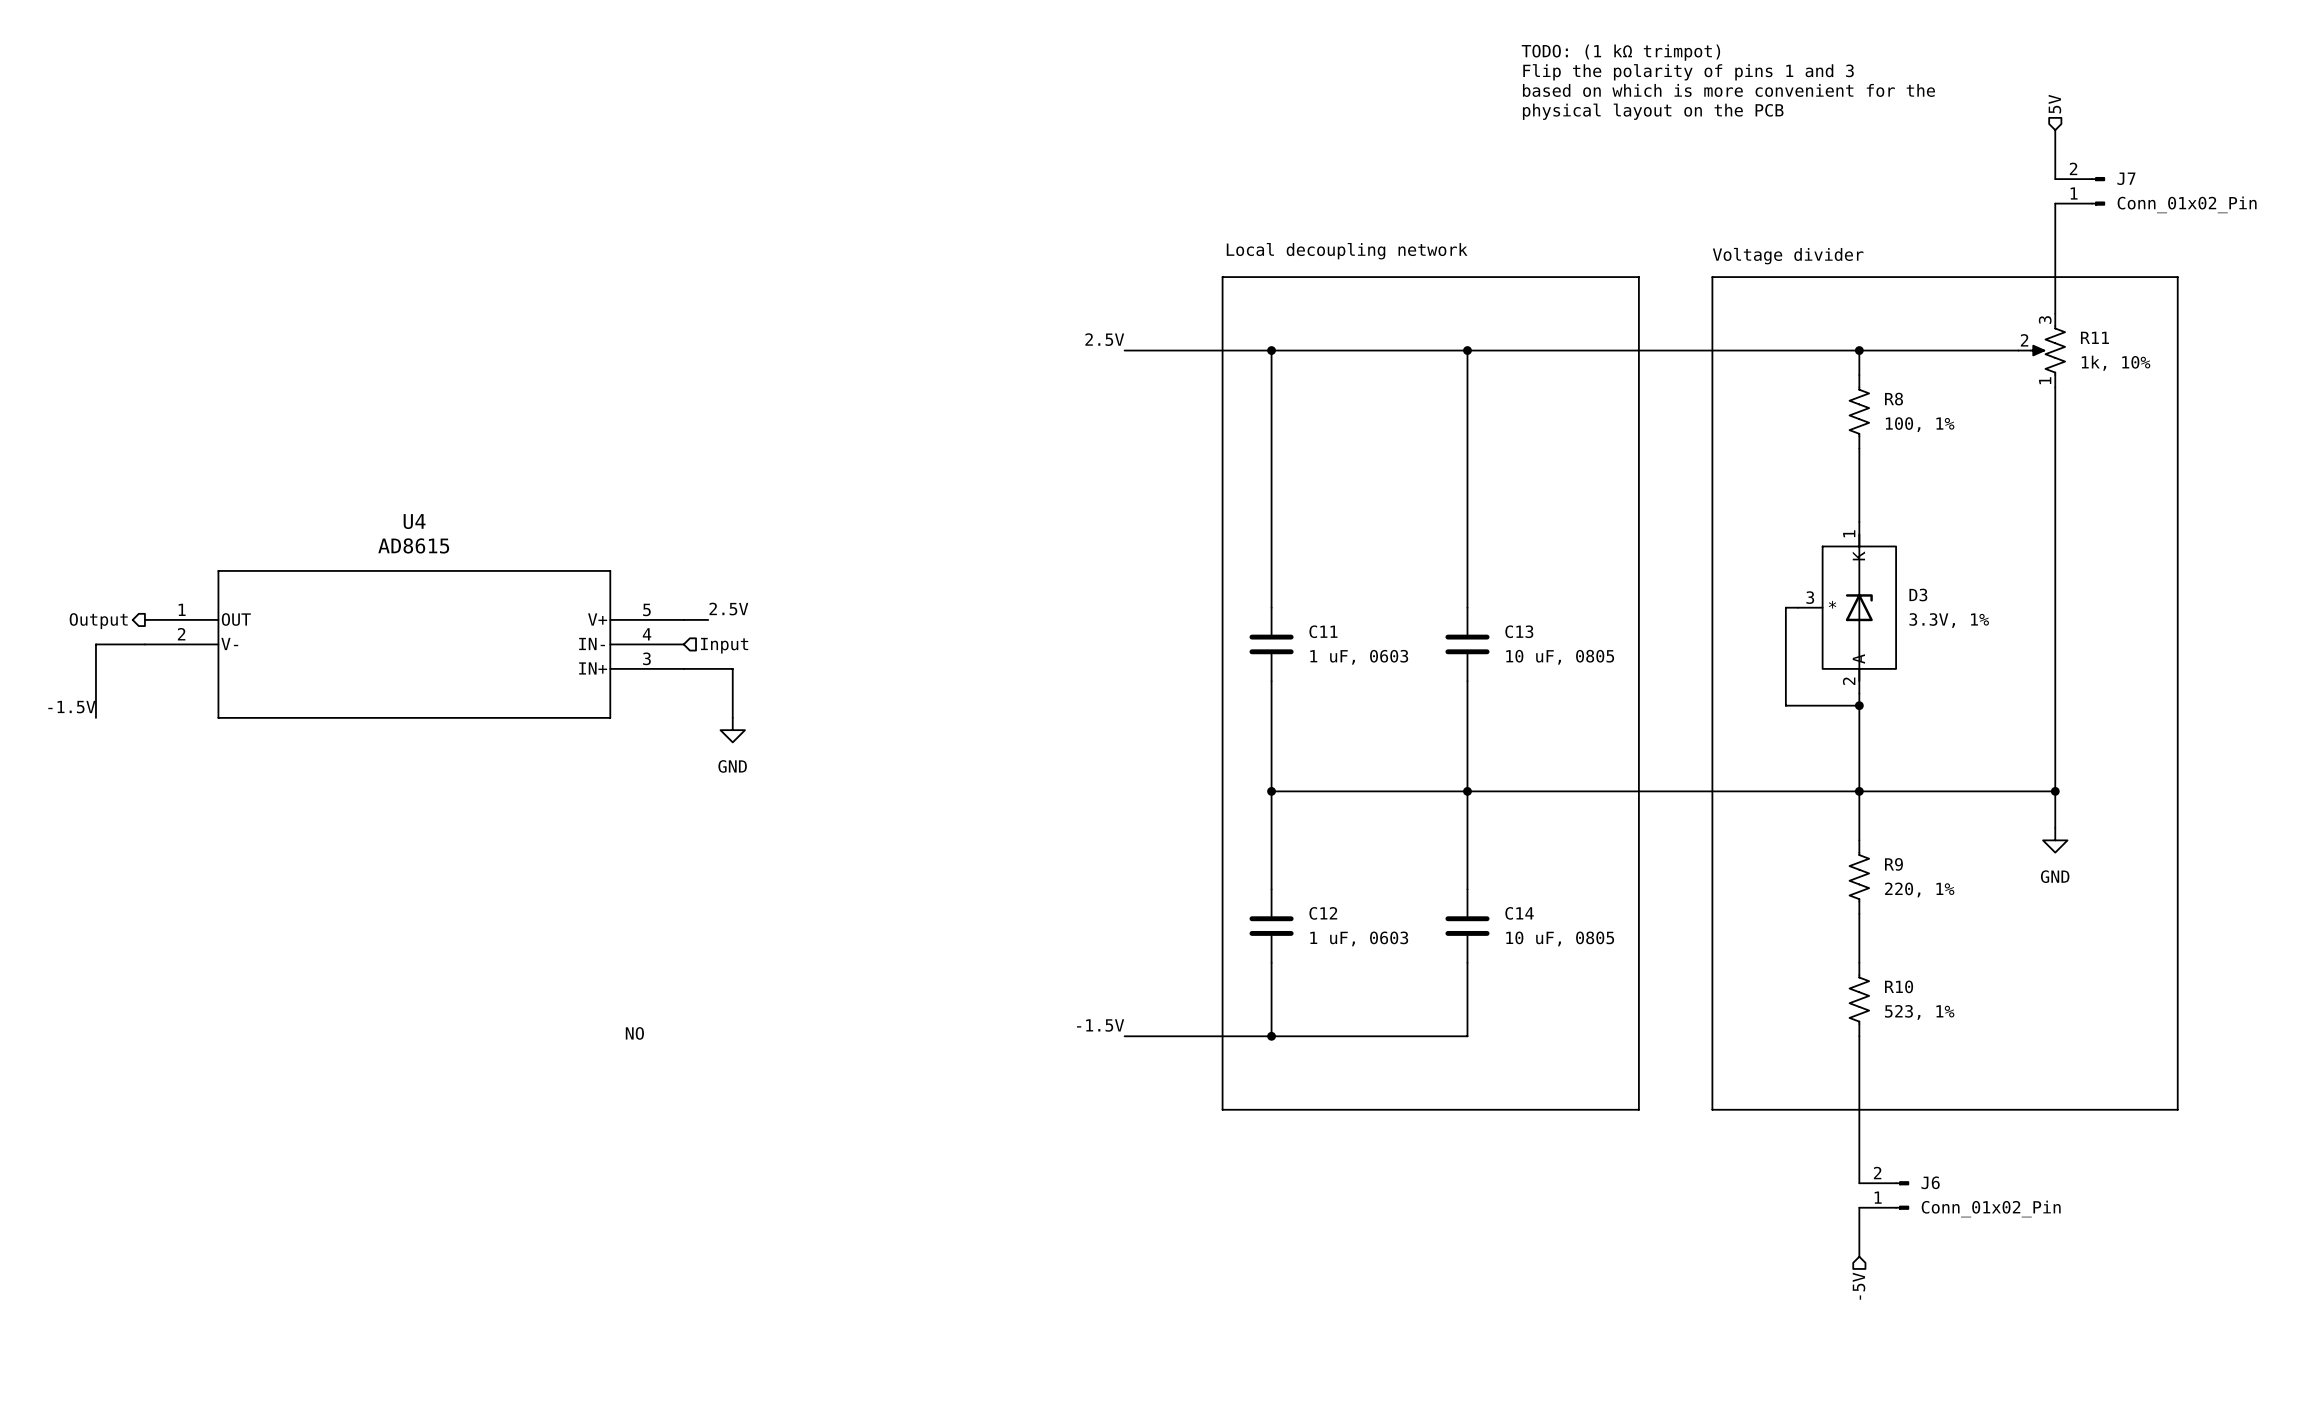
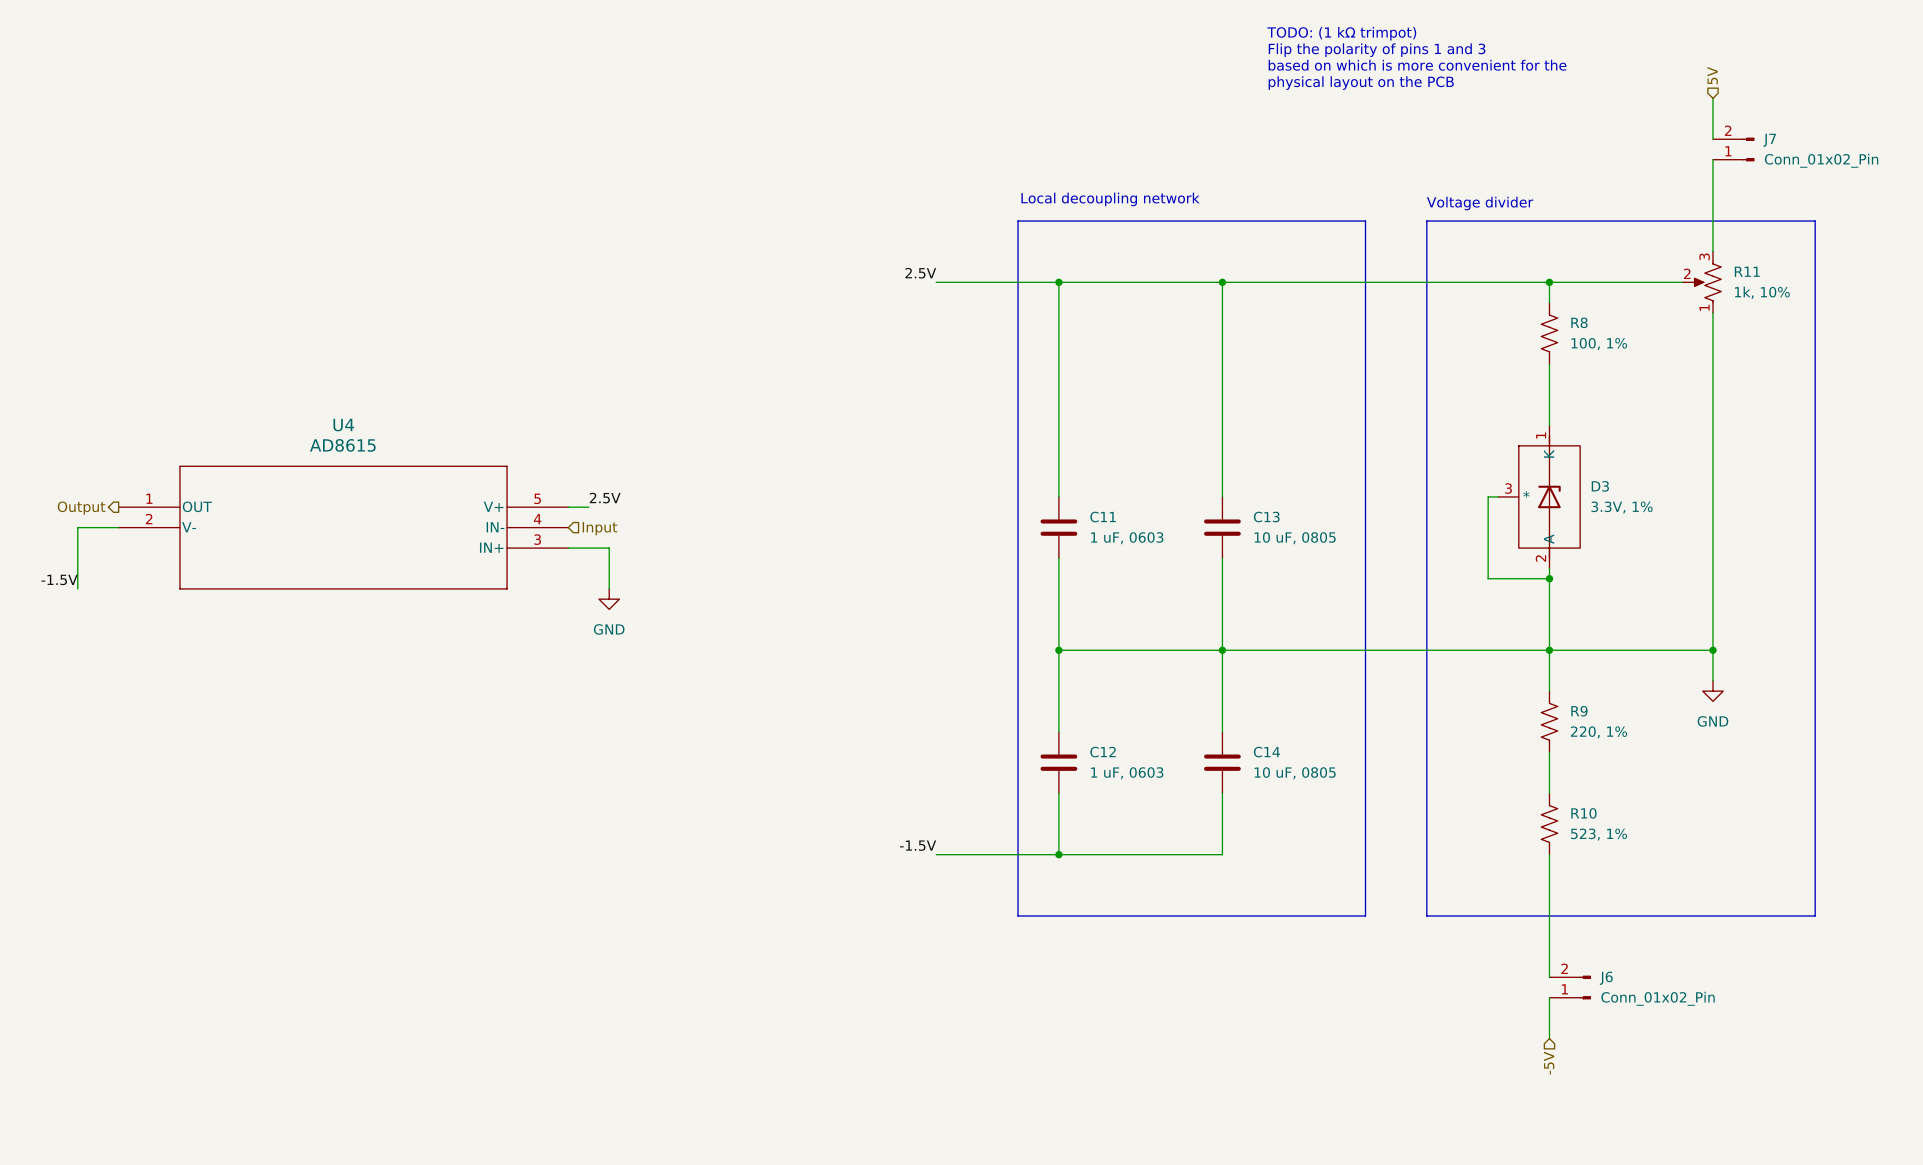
text: NO (634, 1033) -> none

